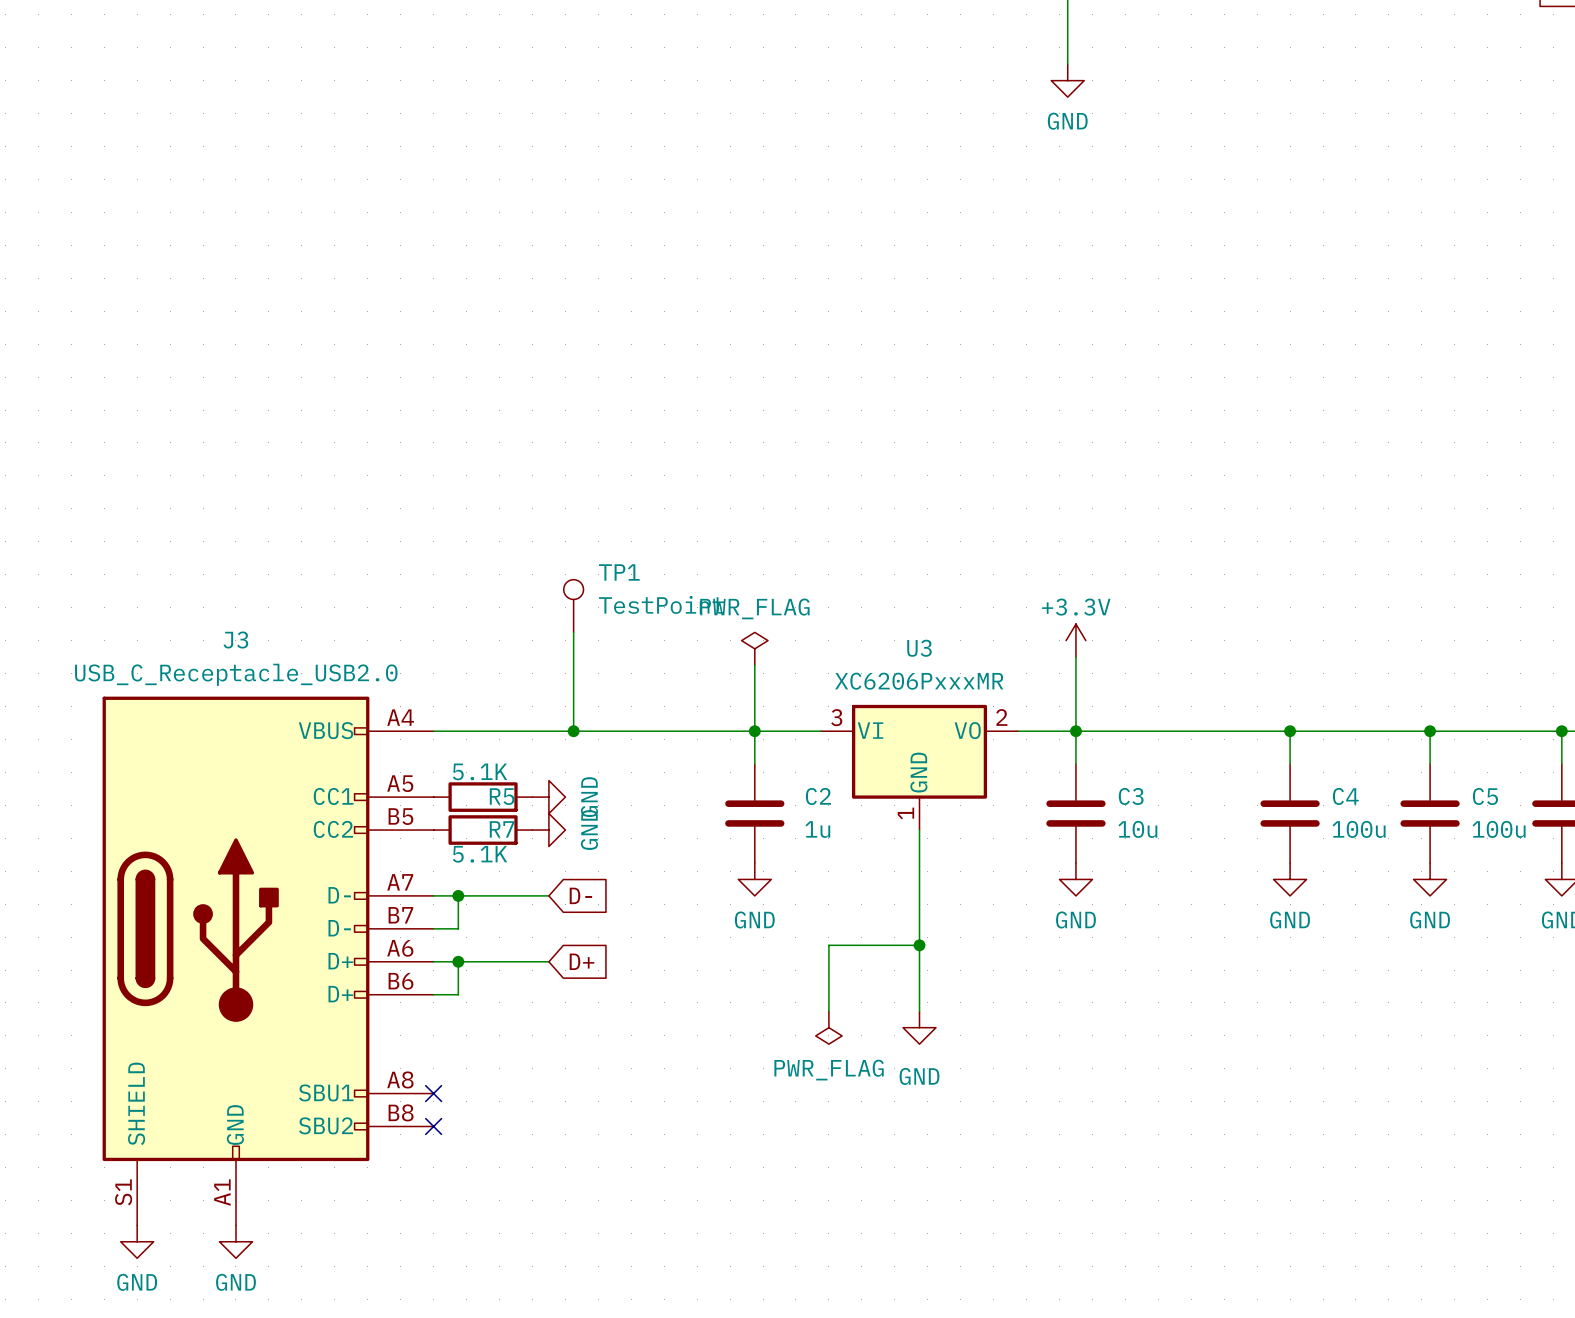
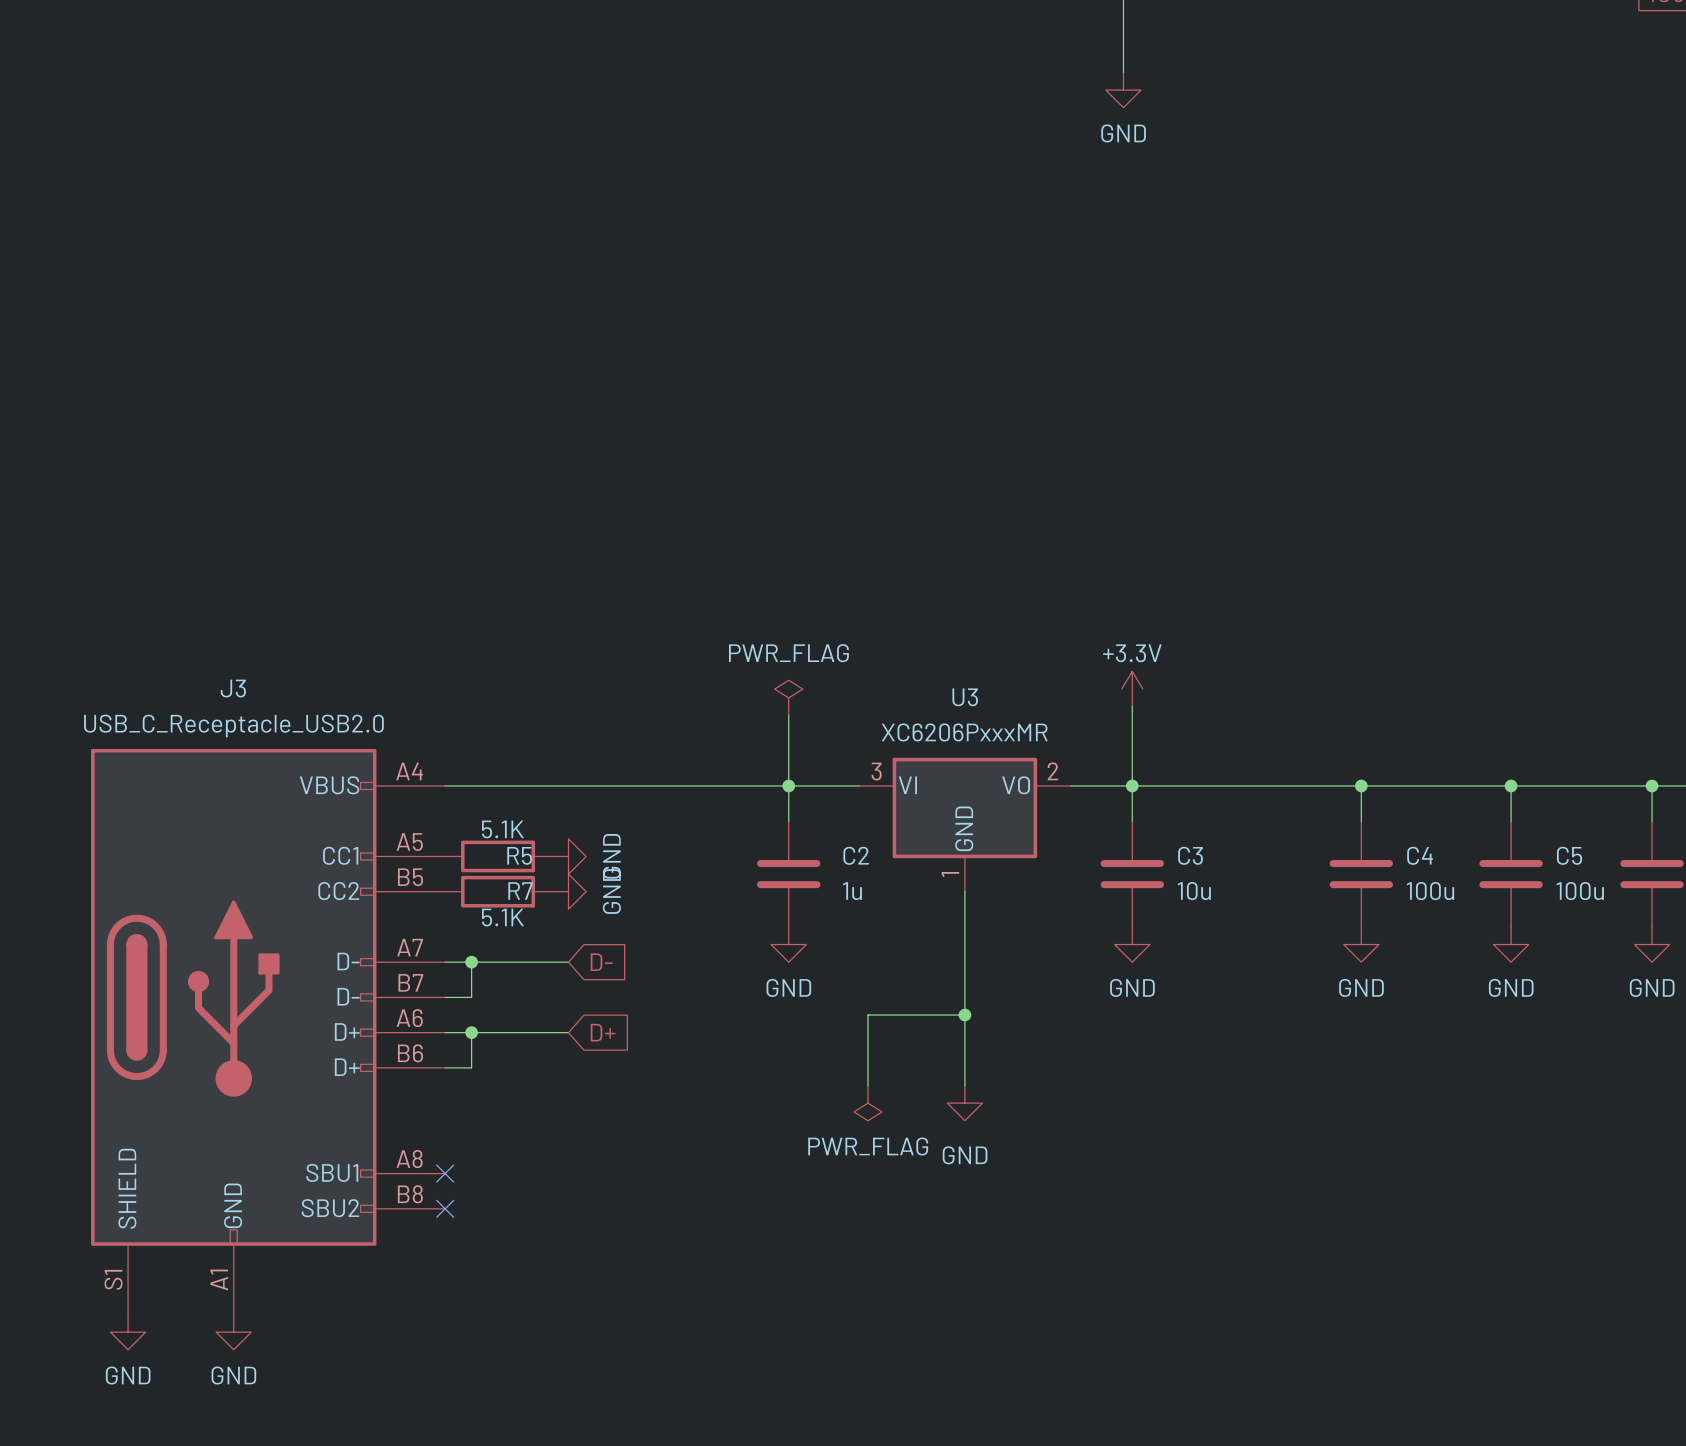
TP1: TestPoint (573, 606) -> none
wire: (573, 632) (573, 731) -> none
junction: (573, 731) -> none

